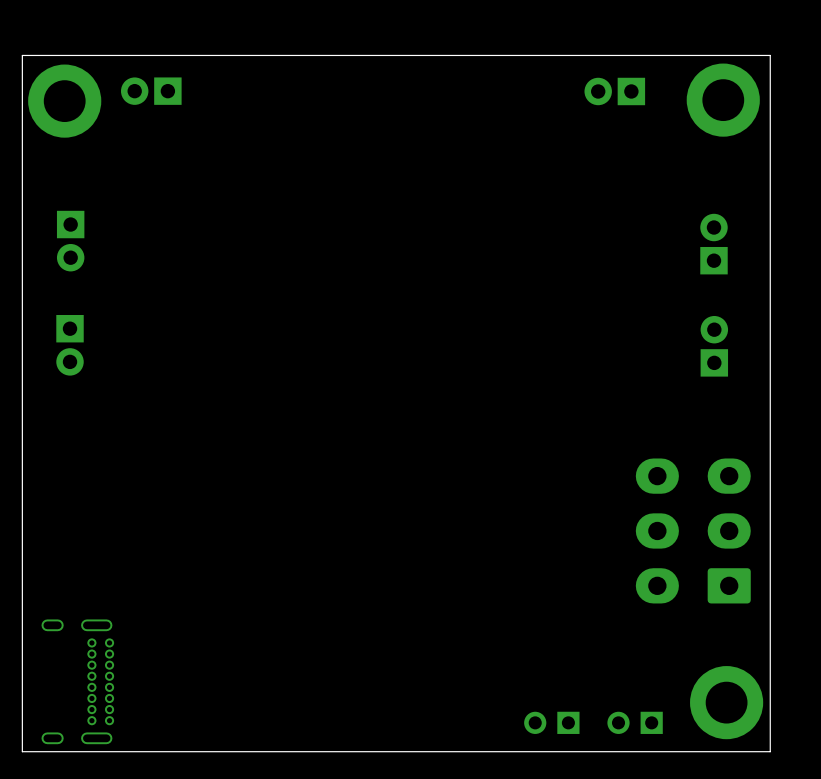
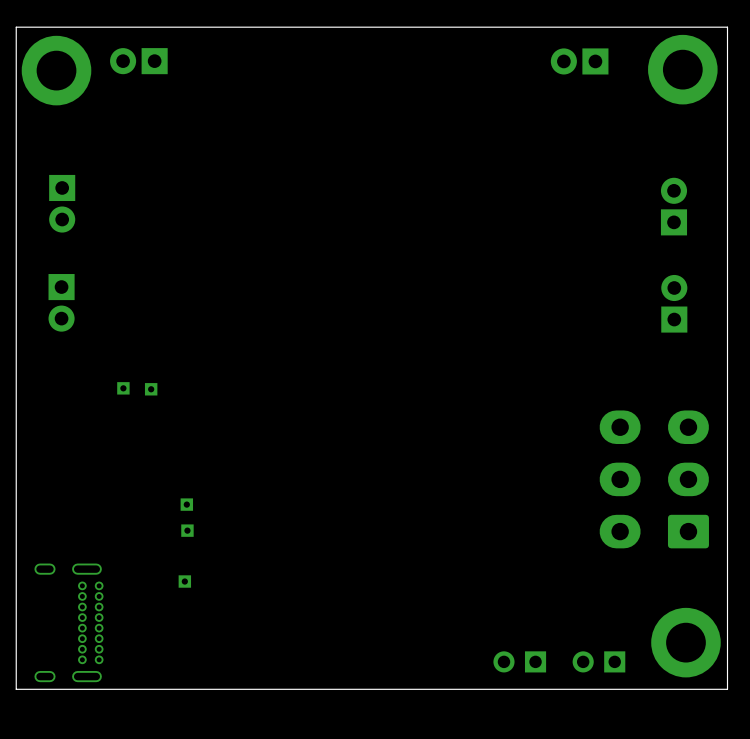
part: none -> (123, 388)
part: none -> (151, 389)
part: none -> (186, 504)
part: none -> (187, 530)
part: none -> (184, 581)

